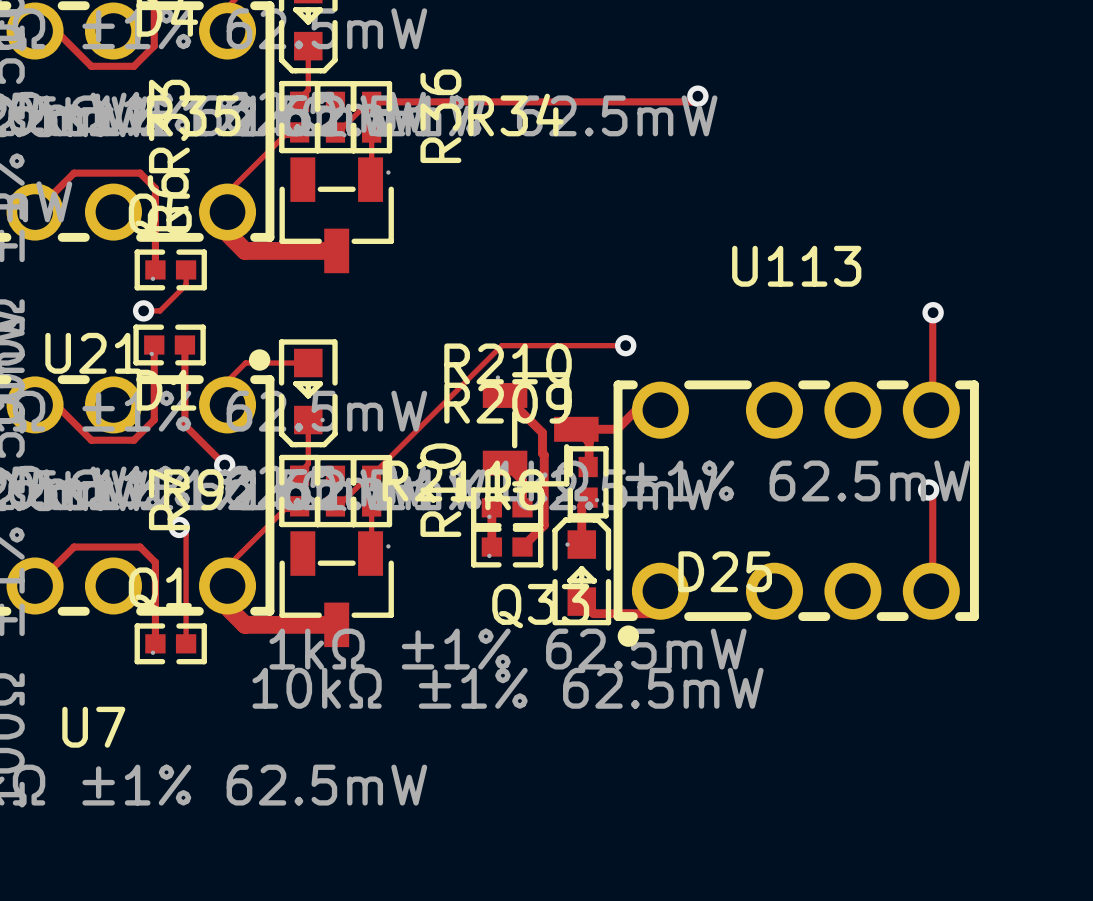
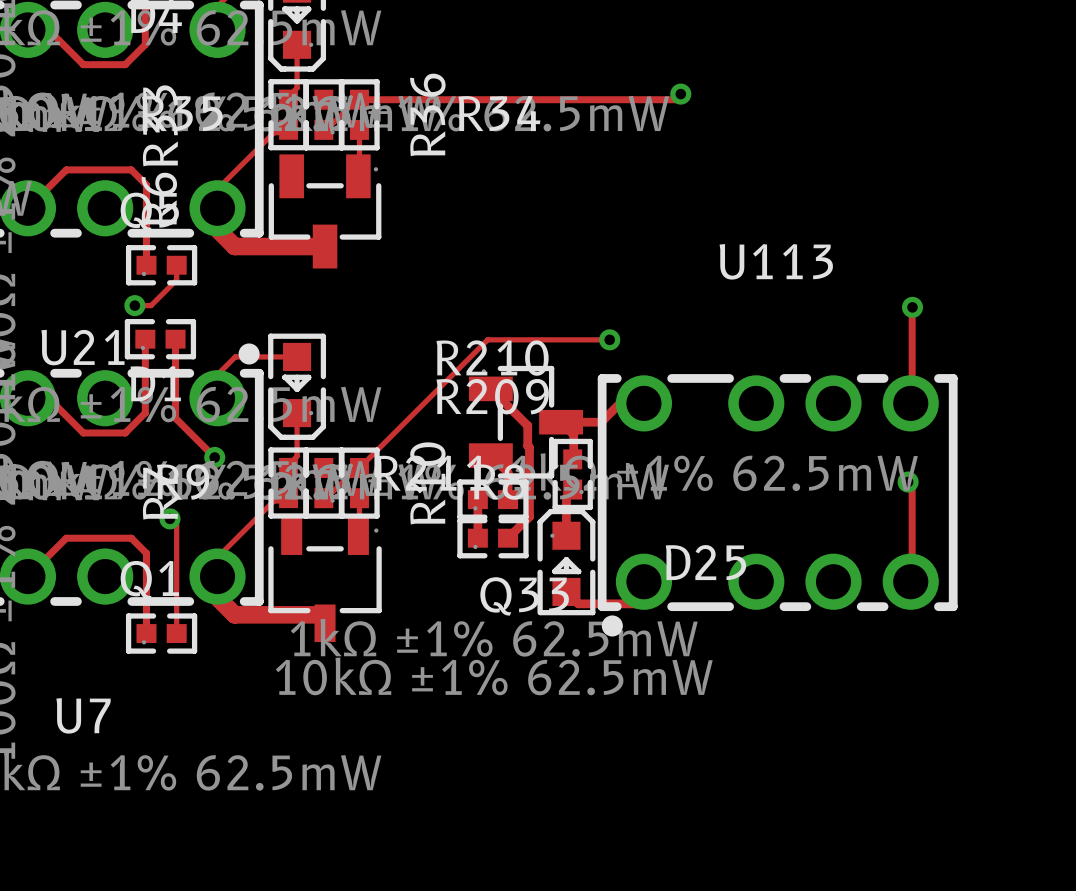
Q1 footprint: [279, 531, 394, 648] -> [268, 517, 382, 643]

